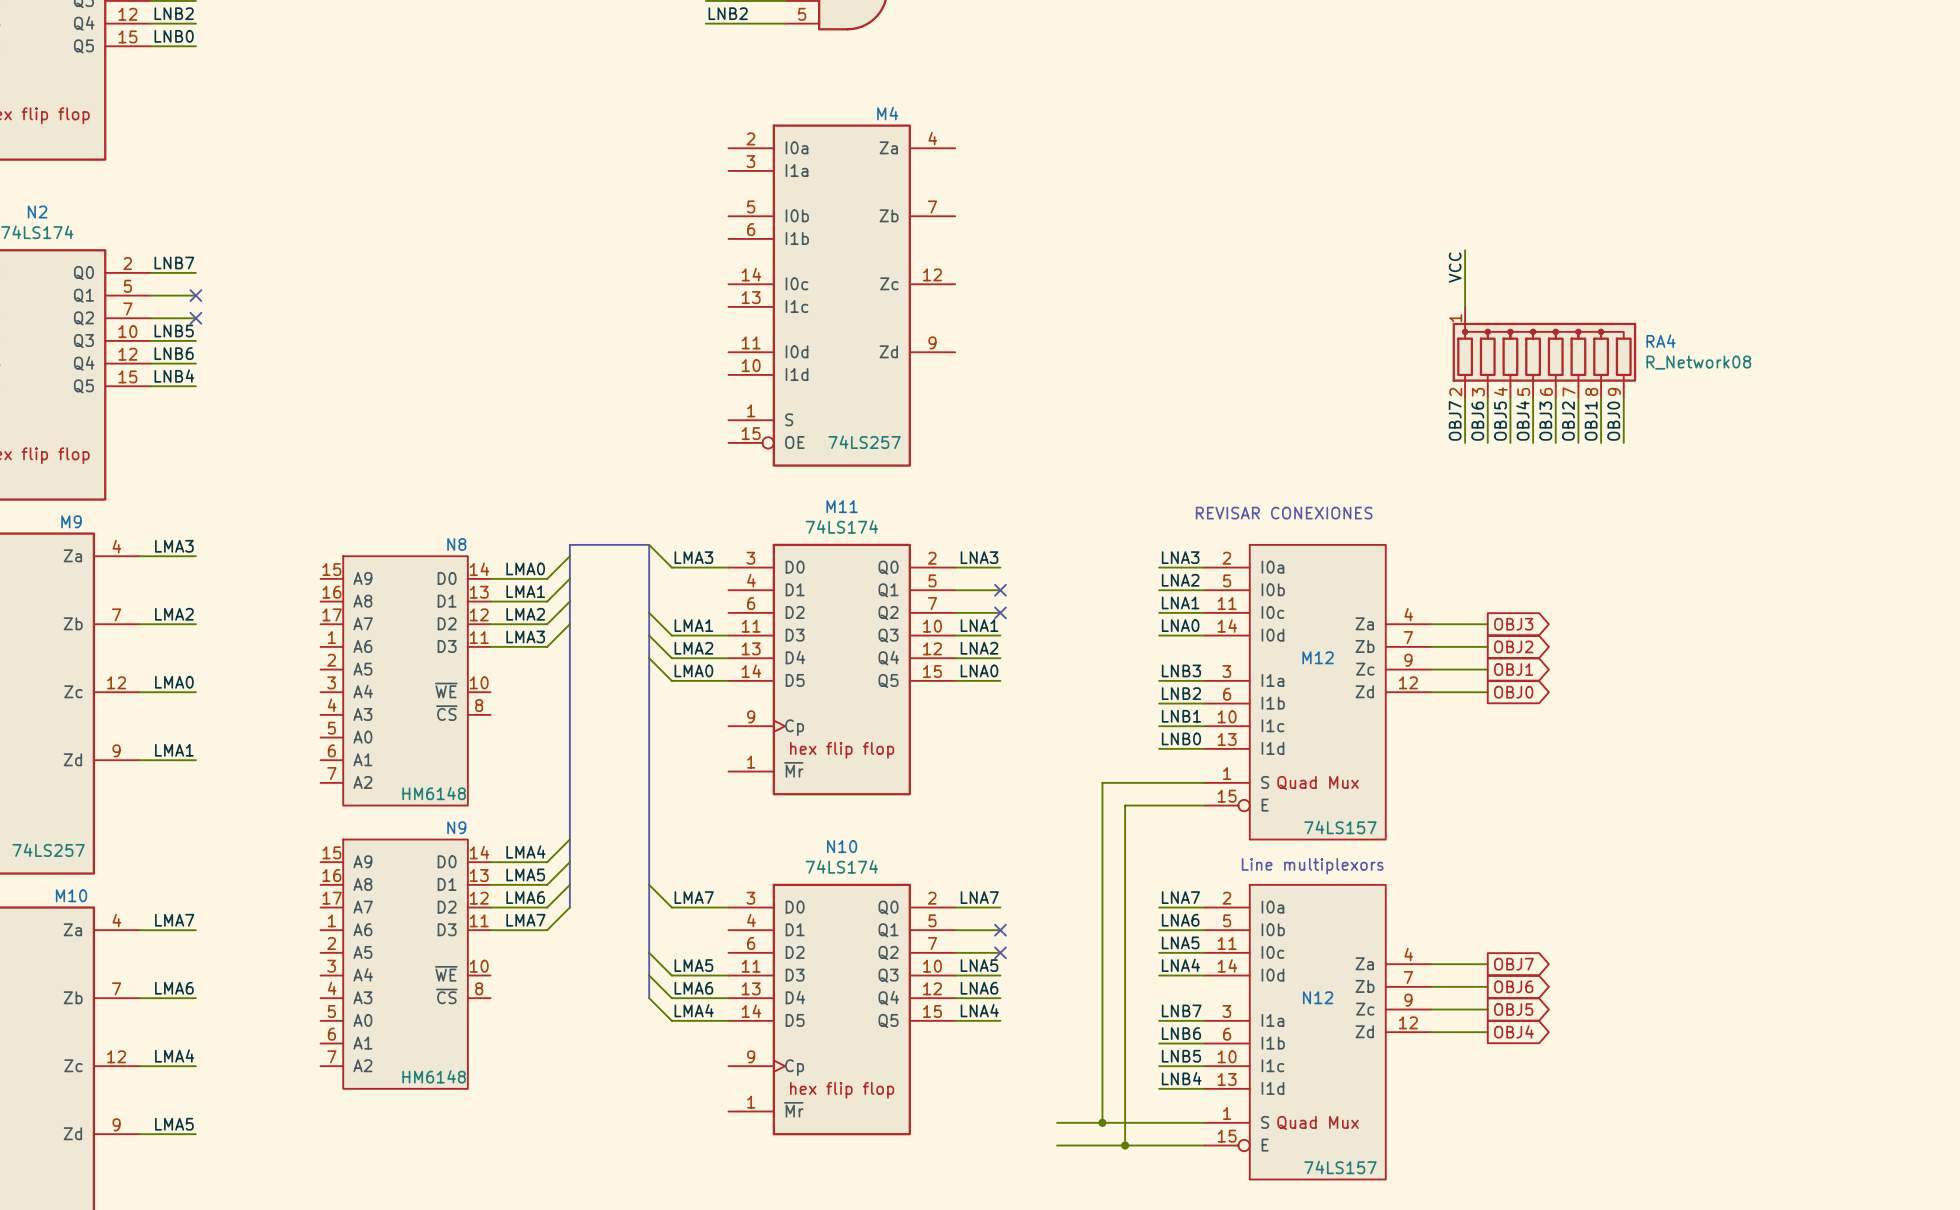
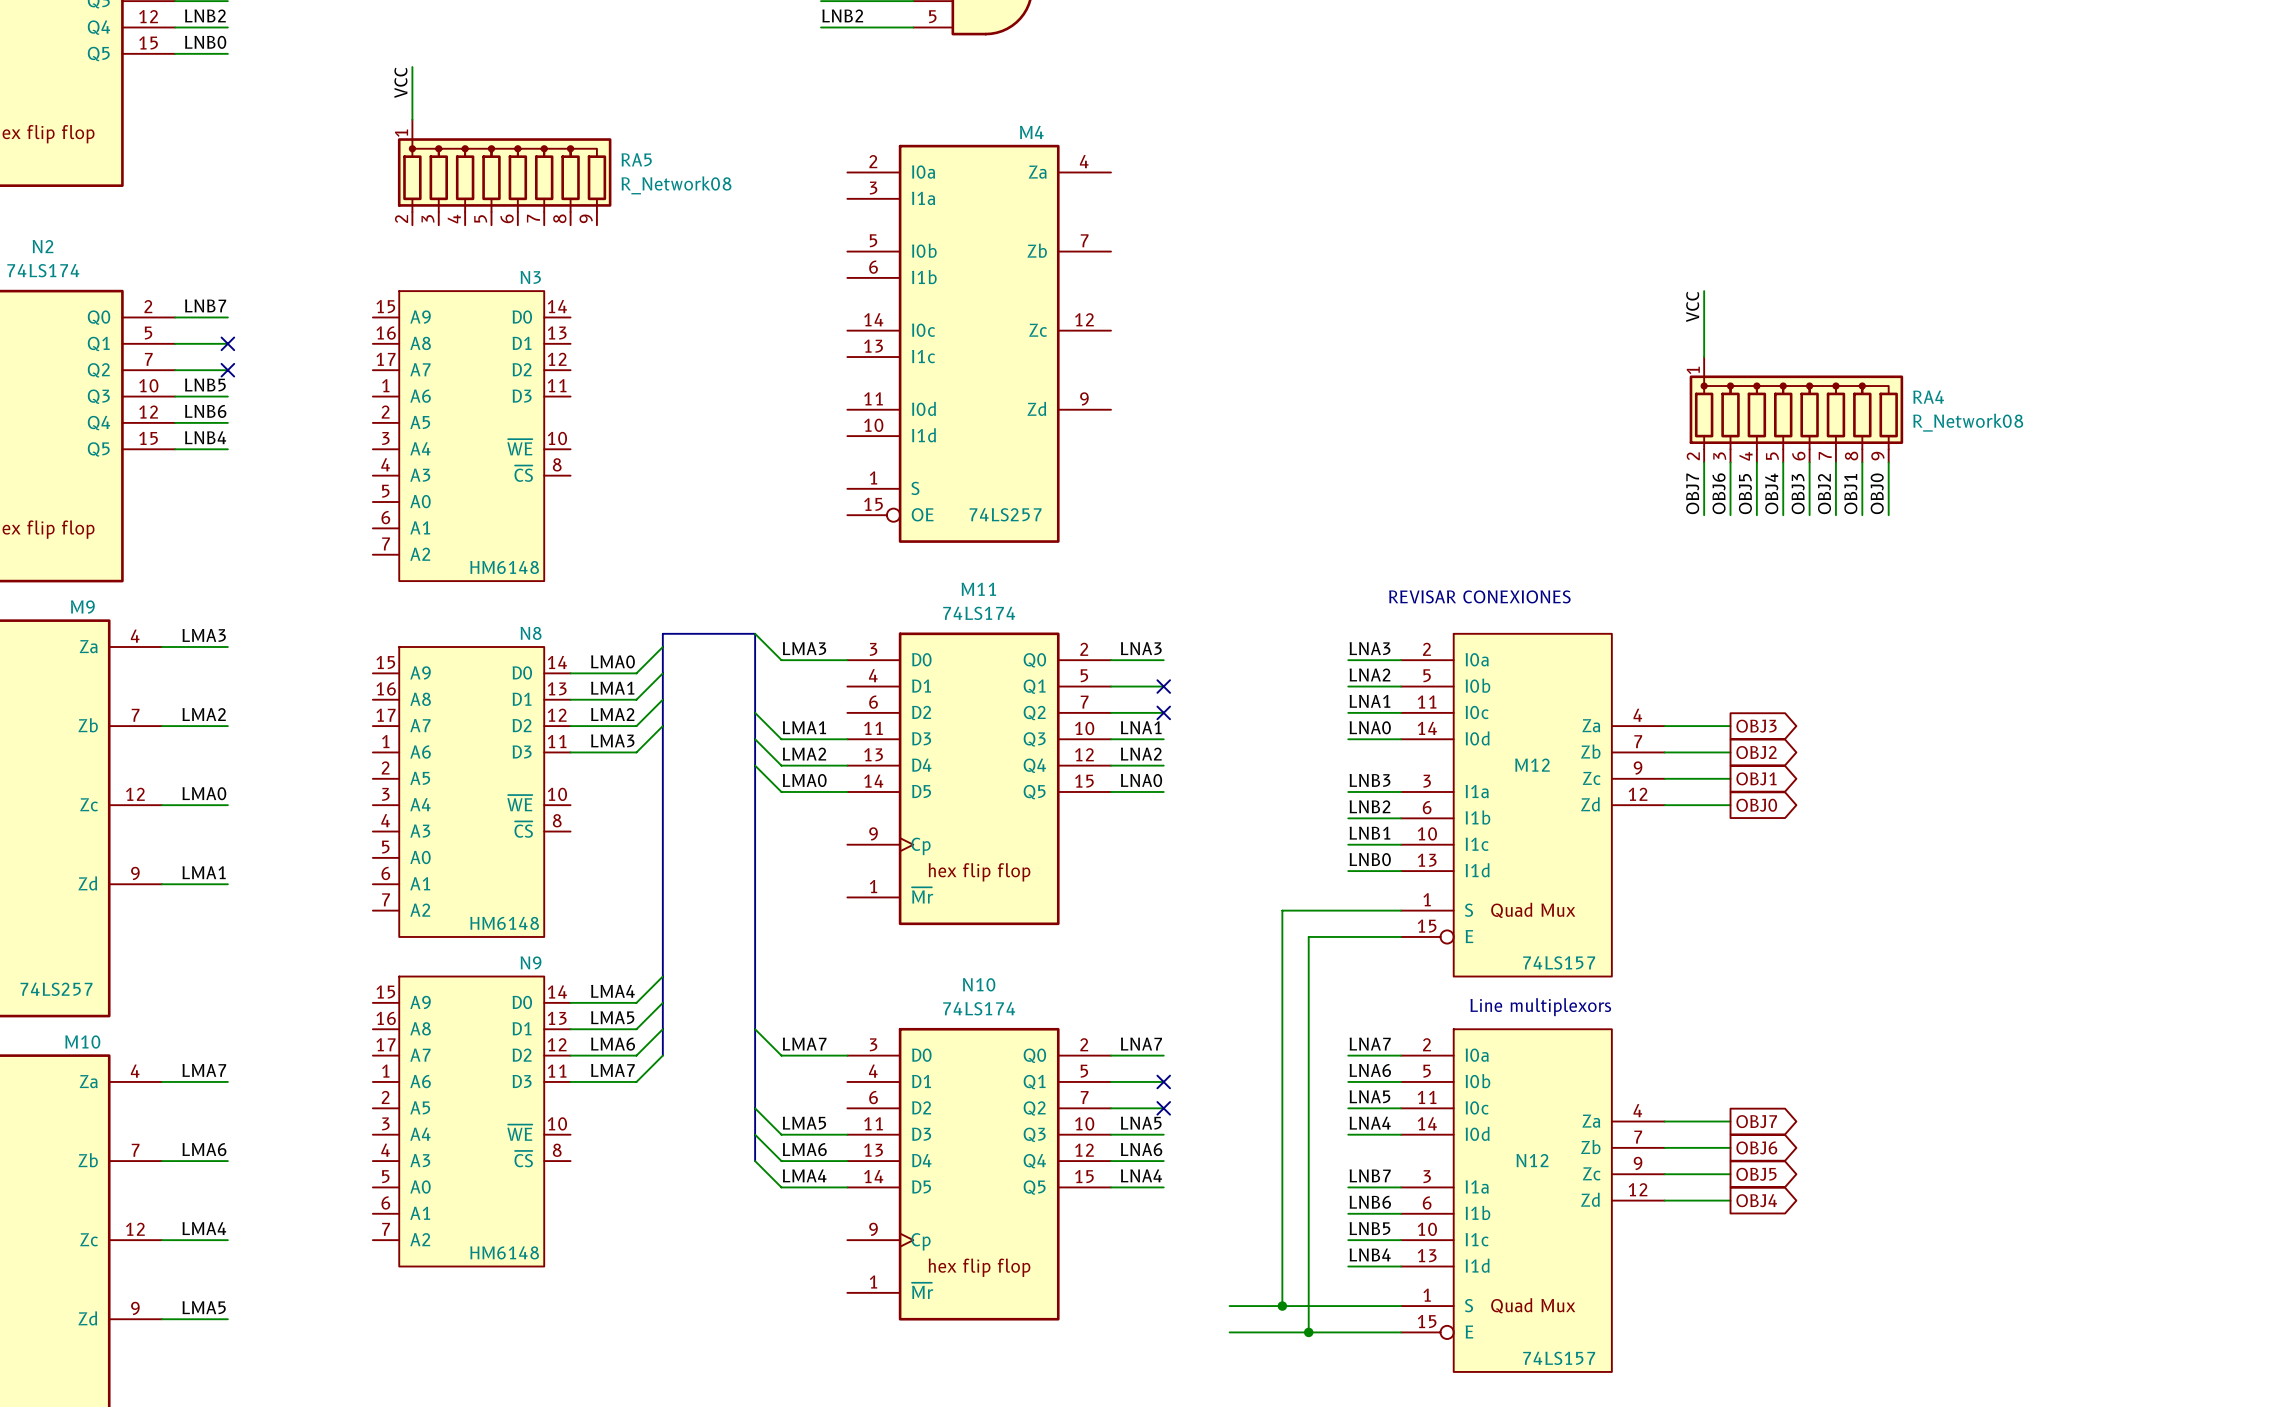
wire: none -> (412, 67) (412, 119)
label: none -> VCC (400, 82)
RA5: none -> R_Network08 (504, 172)
N3: none -> HM6148 (471, 436)

